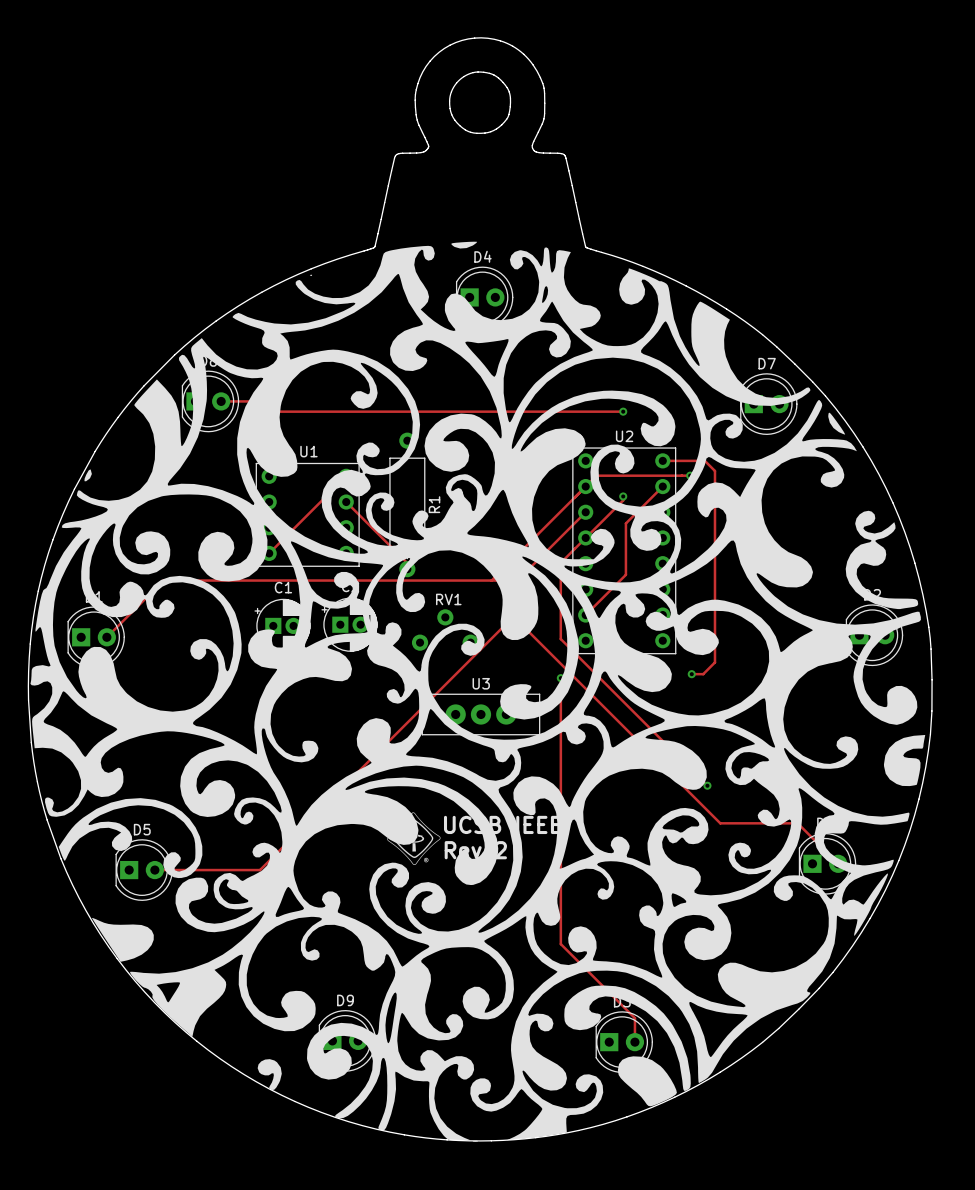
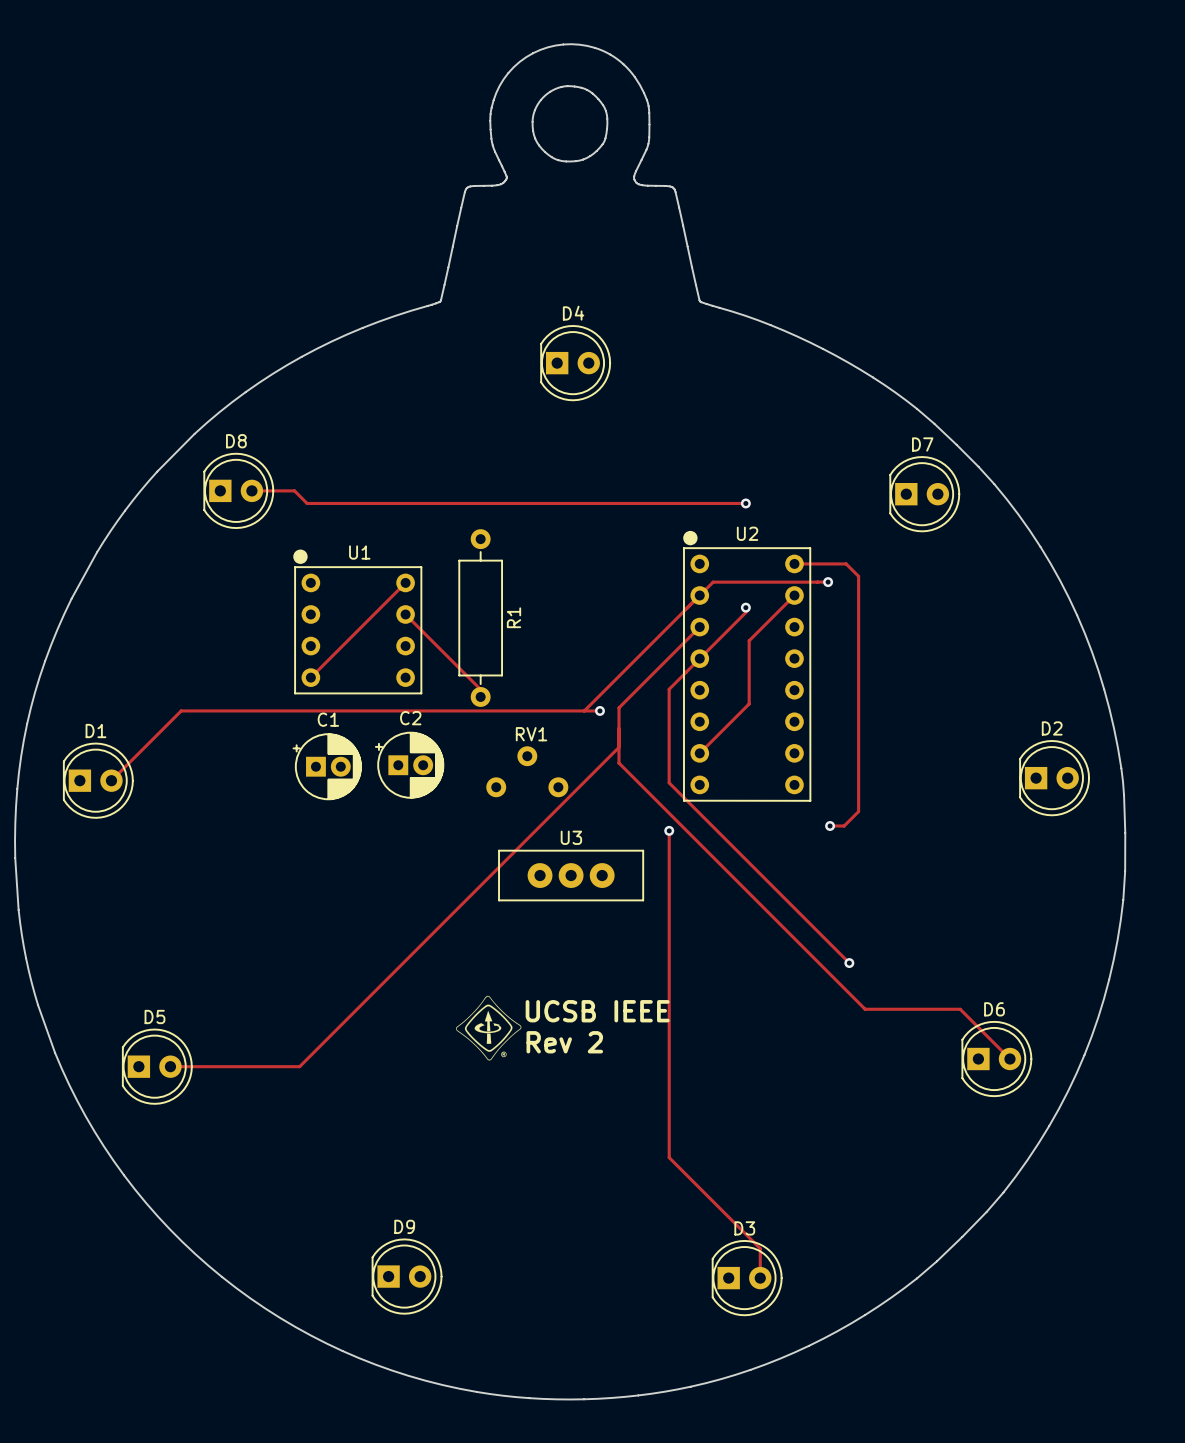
drawing: [30, 241, 926, 1142] -> none

